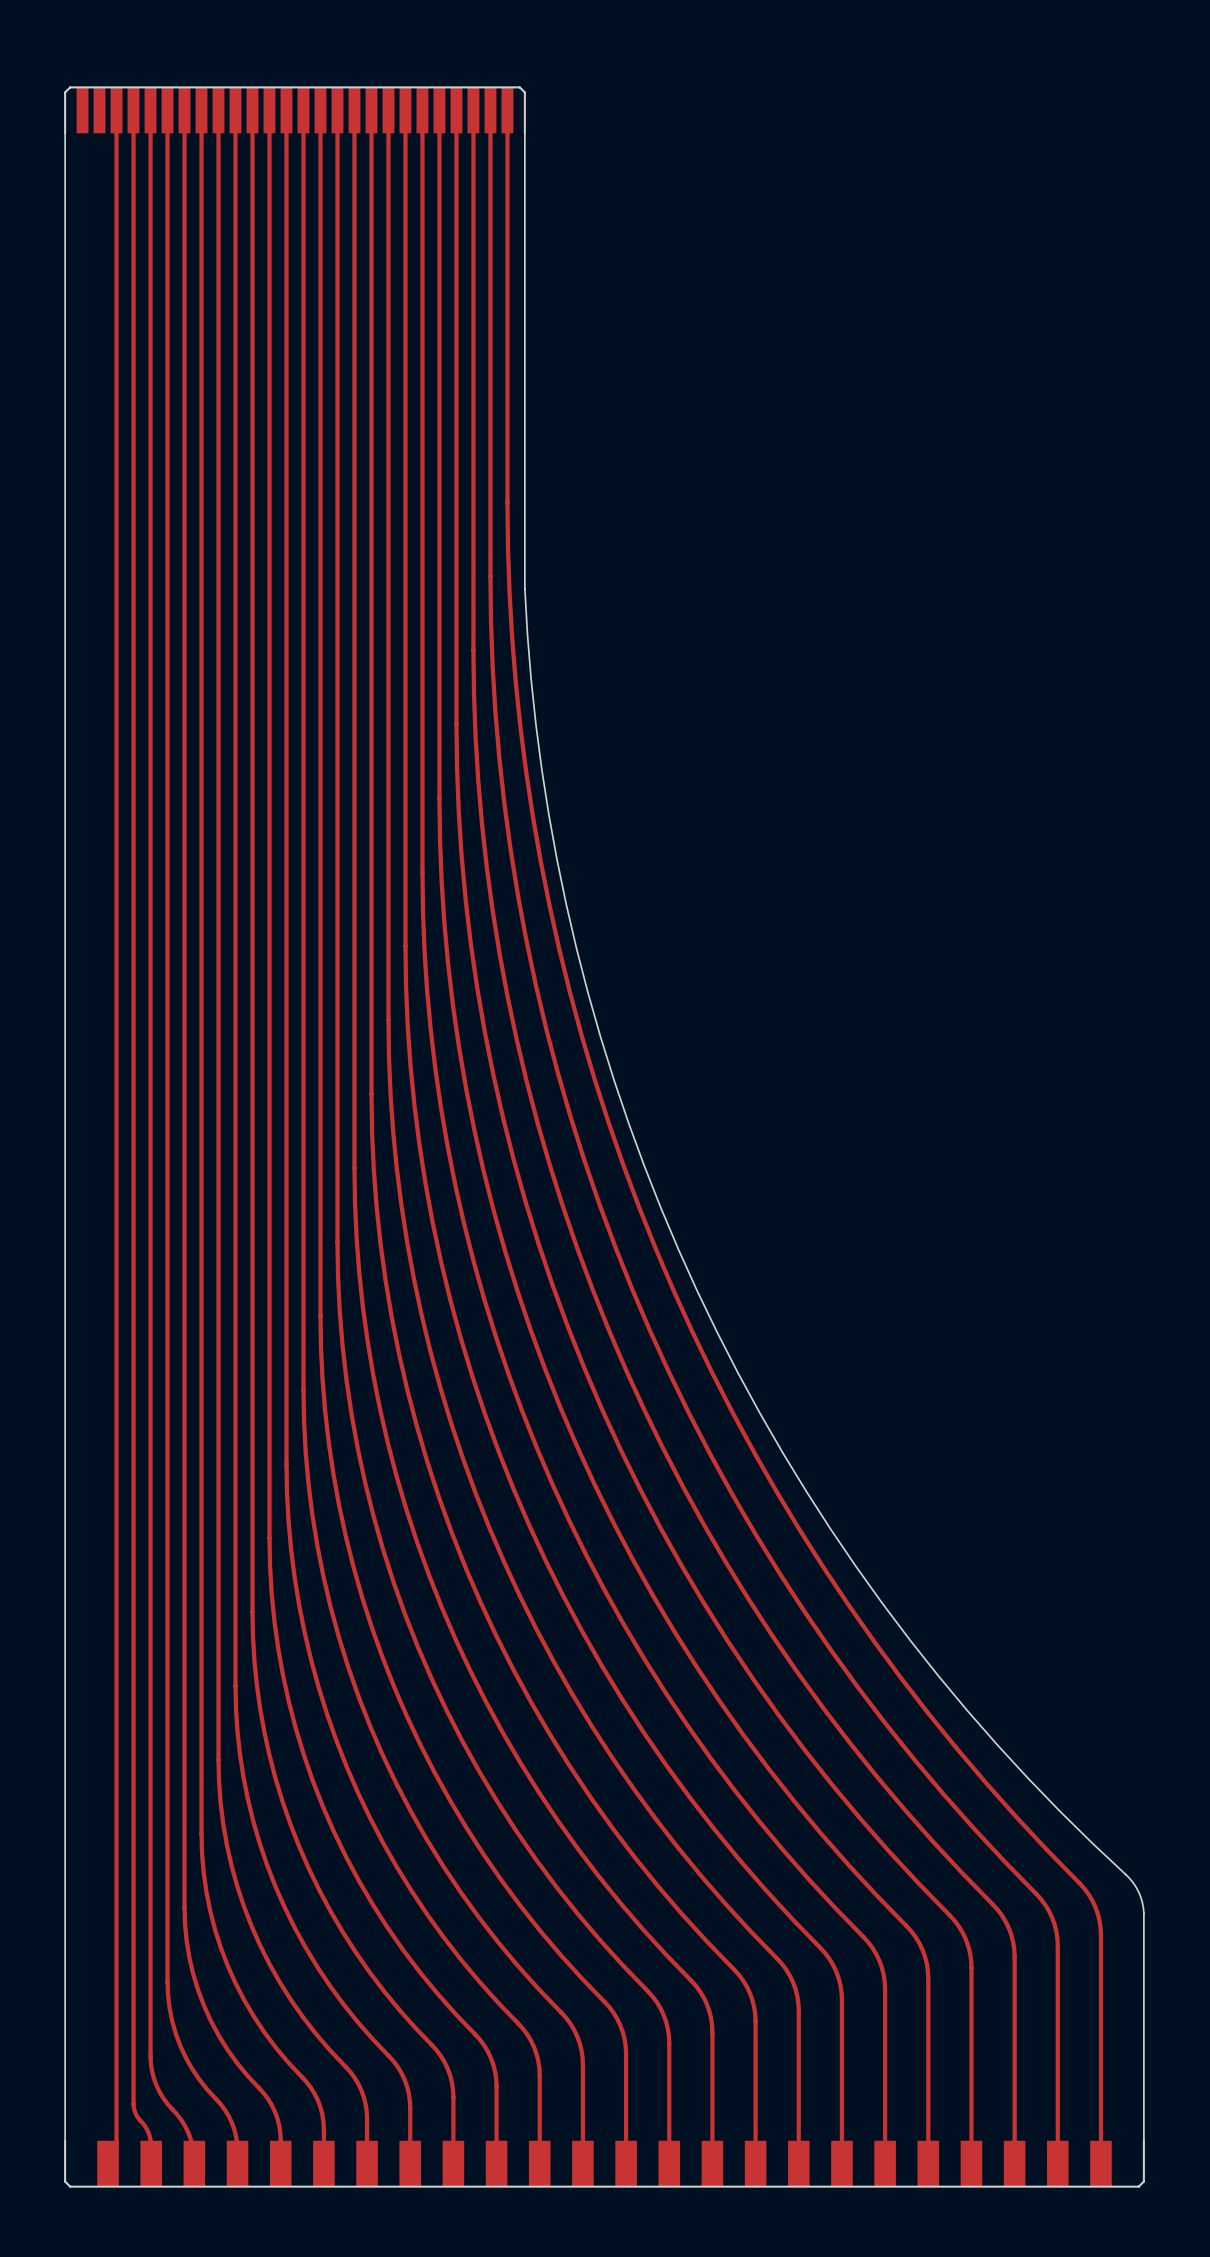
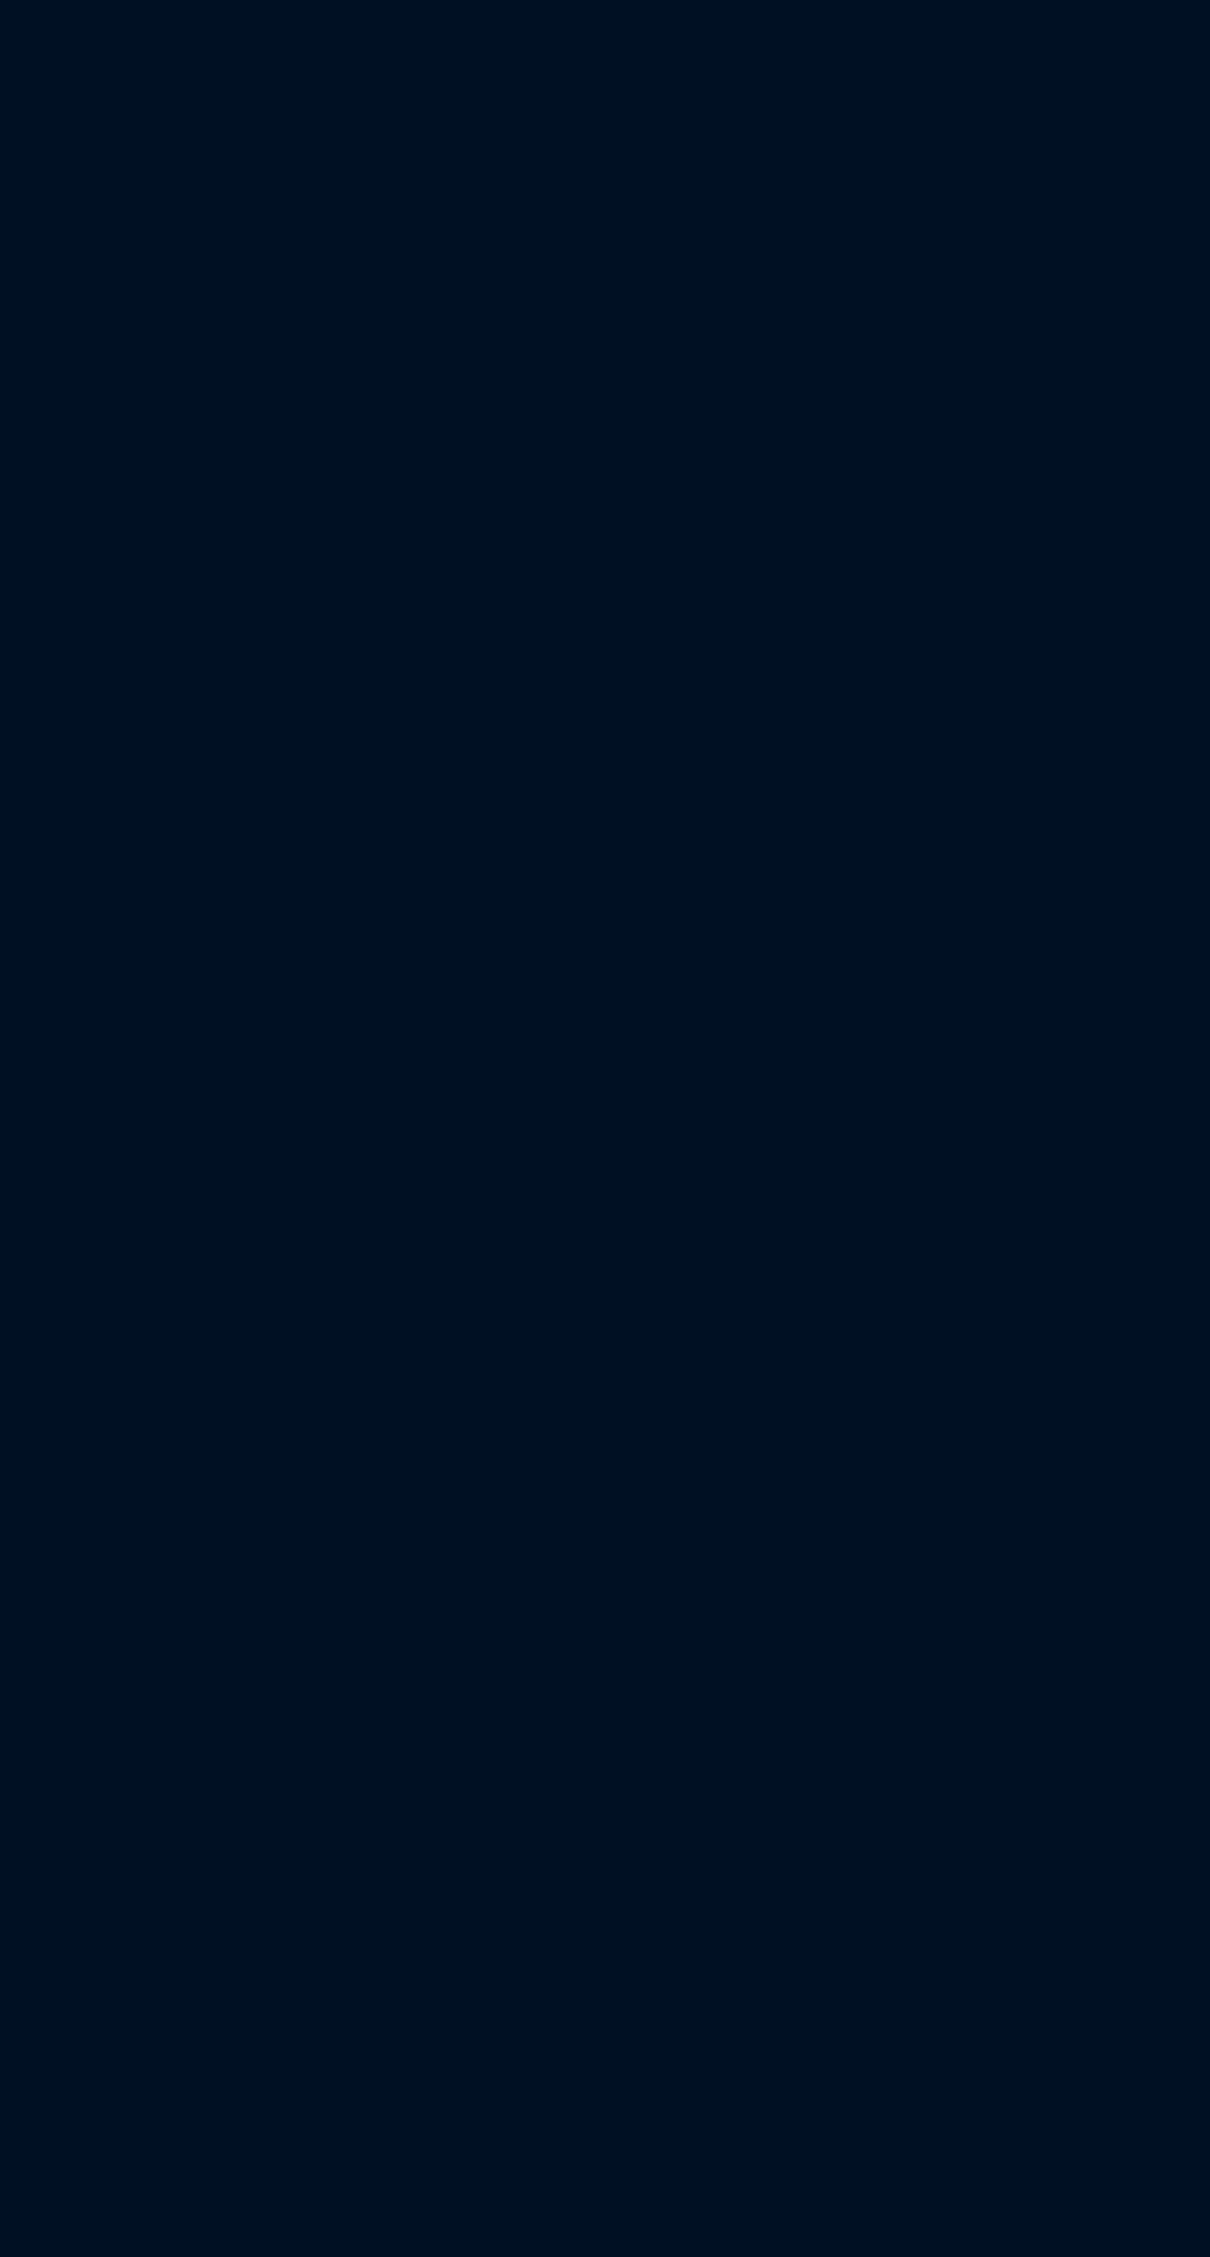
top track: (116, 110) (116, 2143) (114, 2154) (108, 2163) -> none
top track: (133, 110) (133, 2103) (136, 2115) (149, 2135) (151, 2163) -> none
top track: (150, 110) (150, 2056) (153, 2078) (159, 2091) (181, 2120) (188, 2133) (192, 2147) (194, 2163) -> none
top track: (167, 110) (167, 1982) (172, 2020) (180, 2045) (199, 2079) (228, 2116) (236, 2136) (237, 2163) -> none
top track: (184, 110) (185, 1924) (193, 1973) (210, 2020) (227, 2049) (263, 2093) (275, 2112) (280, 2133) (280, 2163) -> none
top track: (201, 110) (202, 1853) (206, 1891) (214, 1929) (235, 1983) (264, 2033) (307, 2082) (318, 2101) (323, 2122) (323, 2163) -> none
top track: (218, 110) (219, 1781) (226, 1844) (237, 1885) (251, 1925) (269, 1964) (291, 2000) (316, 2035) (350, 2071) (358, 2083) (366, 2111) (367, 2163) -> none
top track: (235, 110) (235, 1686) (237, 1731) (243, 1776) (253, 1821) (267, 1864) (284, 1907) (305, 1947) (330, 1985) (357, 2022) (393, 2061) (404, 2079) (409, 2100) (410, 2163) -> none
top track: (252, 110) (252, 1612) (254, 1660) (260, 1707) (269, 1755) (282, 1801) (308, 1868) (330, 1911) (355, 1952) (399, 2009) (436, 2050) (447, 2068) (453, 2089) (453, 2163) -> none
top track: (269, 110) (269, 1538) (274, 1620) (282, 1674) (295, 1728) (322, 1806) (345, 1856) (372, 1904) (403, 1950) (437, 1993) (479, 2039) (490, 2058) (496, 2079) (496, 2163) -> none
top track: (286, 110) (286, 1464) (291, 1548) (304, 1632) (318, 1686) (336, 1740) (370, 1818) (397, 1867) (427, 1915) (479, 1982) (523, 2028) (534, 2047) (539, 2075) (539, 2163) -> none
part: (294, 110) -> none
top track: (303, 110) (303, 1390) (305, 1452) (312, 1515) (323, 1577) (339, 1638) (370, 1727) (396, 1784) (426, 1839) (460, 1892) (518, 1966) (566, 2017) (577, 2036) (582, 2064) (582, 2163) -> none
top track: (320, 110) (320, 1316) (322, 1379) (333, 1474) (345, 1536) (371, 1627) (394, 1687) (434, 1773) (466, 1828) (501, 1880) (561, 1955) (609, 2007) (620, 2025) (626, 2053) (626, 2163) -> none
top track: (337, 110) (337, 1242) (339, 1311) (351, 1414) (365, 1482) (393, 1582) (418, 1647) (462, 1741) (497, 1801) (535, 1859) (600, 1940) (652, 1996) (663, 2014) (669, 2043) (669, 2163) -> none
top track: (354, 110) (354, 1168) (359, 1272) (373, 1375) (387, 1443) (417, 1542) (455, 1639) (486, 1701) (538, 1791) (577, 1848) (643, 1929) (695, 1985) (706, 2004) (712, 2032) (712, 2163) -> none
top track: (371, 110) (372, 1131) (380, 1243) (391, 1317) (416, 1426) (439, 1497) (480, 1602) (513, 1669) (549, 1734) (612, 1827) (682, 1915) (738, 1974) (749, 1993) (755, 2021) (755, 2163) -> none
top track: (388, 110) (389, 1057) (396, 1168) (413, 1279) (440, 1387) (475, 1493) (519, 1596) (554, 1662) (591, 1726) (655, 1818) (726, 1904) (782, 1964) (793, 1982) (798, 2010) (798, 2163) -> none
top track: (405, 110) (406, 985) (414, 1104) (432, 1222) (460, 1338) (498, 1451) (529, 1524) (582, 1631) (644, 1733) (690, 1798) (765, 1890) (825, 1953) (836, 1971) (841, 1999) (841, 2163) -> none
top track: (422, 110) (422, 911) (427, 990) (435, 1068) (455, 1185) (484, 1299) (508, 1374) (552, 1484) (604, 1590) (644, 1659) (710, 1757) (783, 1850) (868, 1942) (879, 1960) (885, 1989) (885, 2163) -> none
top track: (439, 110) (439, 798) (441, 881) (453, 1006) (466, 1088) (483, 1170) (517, 1291) (545, 1369) (594, 1485) (653, 1595) (720, 1701) (769, 1769) (849, 1865) (911, 1931) (922, 1950) (928, 1978) (928, 2163) -> none
top track: (456, 110) (456, 724) (458, 812) (470, 944) (484, 1031) (503, 1117) (538, 1244) (568, 1327) (620, 1449) (682, 1566) (728, 1641) (804, 1749) (889, 1851) (954, 1920) (965, 1939) (971, 1967) (971, 2163) -> none
top track: (473, 110) (473, 650) (475, 737) (482, 824) (492, 910) (507, 996) (526, 1081) (562, 1206) (592, 1288) (643, 1408) (703, 1524) (772, 1635) (822, 1707) (904, 1809) (997, 1910) (1009, 1928) (1014, 1956) (1014, 2163) -> none
top track: (490, 110) (490, 576) (495, 713) (504, 804) (517, 894) (535, 984) (557, 1073) (599, 1204) (650, 1331) (710, 1454) (755, 1534) (830, 1649) (884, 1722) (973, 1827) (1041, 1899) (1052, 1917) (1057, 1946) (1057, 2163) -> none
top track: (507, 110) (507, 502) (512, 637) (520, 727) (532, 816) (549, 905) (582, 1036) (623, 1165) (673, 1291) (712, 1372) (776, 1491) (824, 1568) (901, 1679) (987, 1784) (1084, 1888) (1095, 1907) (1100, 1935) (1100, 2163) -> none
board edge: (65, 133) (65, 2140) -> none
board edge: (524, 133) (524, 588) (531, 679) (541, 769) (557, 859) (576, 948) (600, 1036) (644, 1165) (697, 1291) (759, 1412) (806, 1491) (856, 1567) (938, 1676) (1028, 1778) (1129, 1878) (1138, 1892) (1143, 1913) (1143, 2140) -> none
part: (604, 2163) -> none

